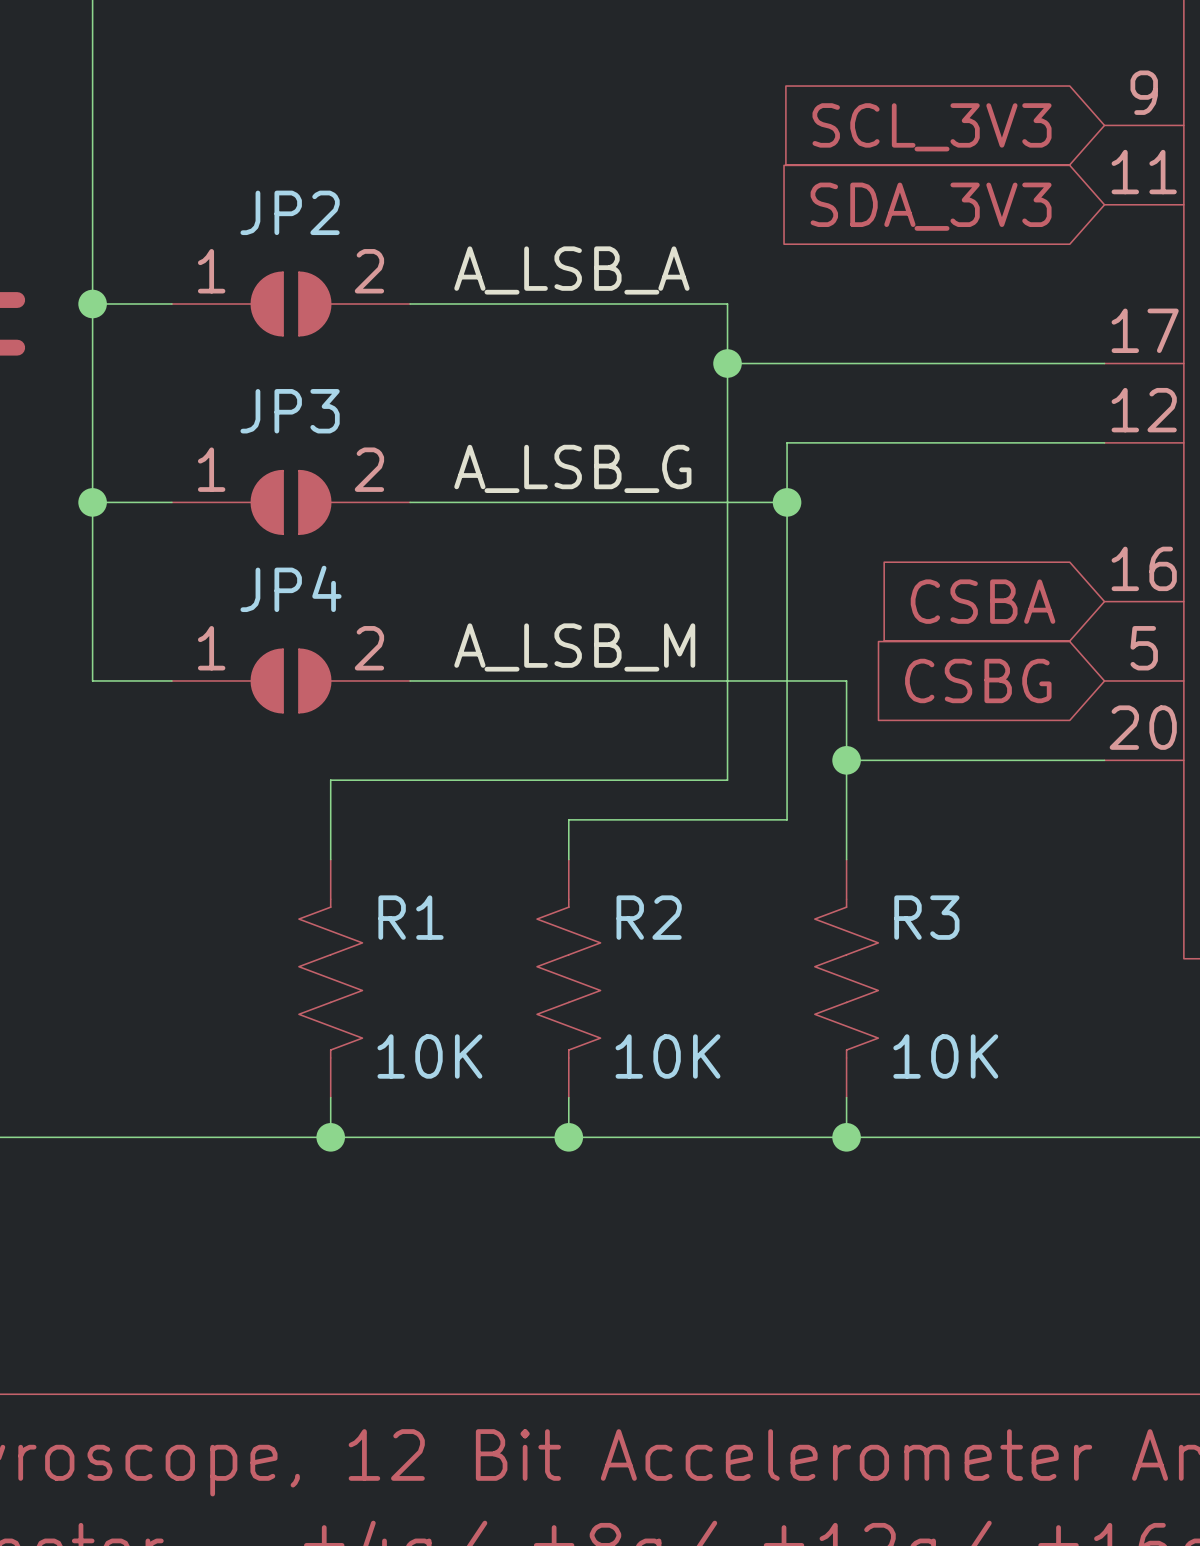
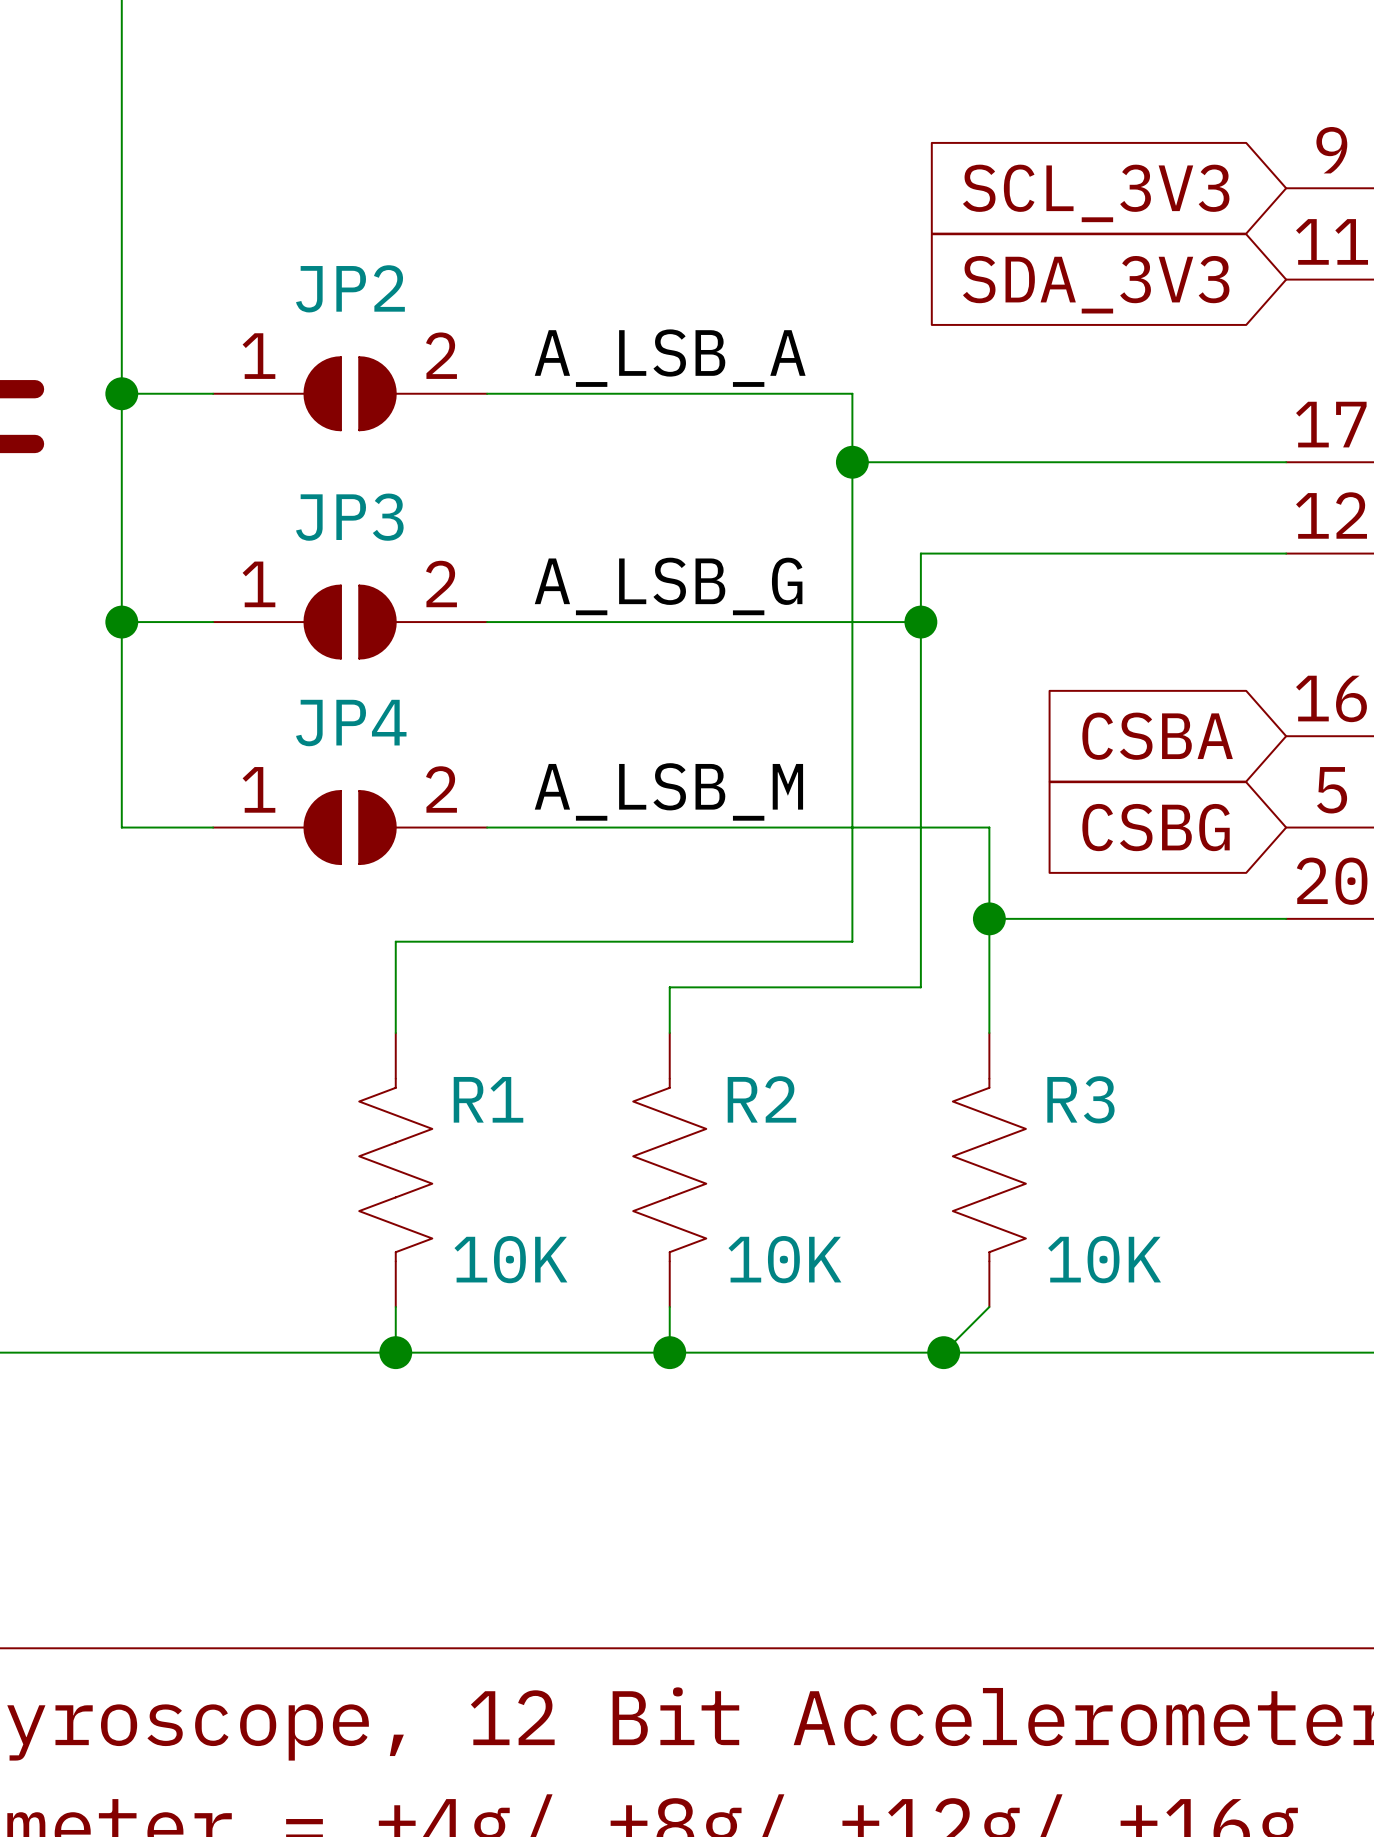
wire: (846, 1097) (846, 1137) -> (989, 1306) (943, 1352)
junction position: (846, 1137) -> (943, 1352)

